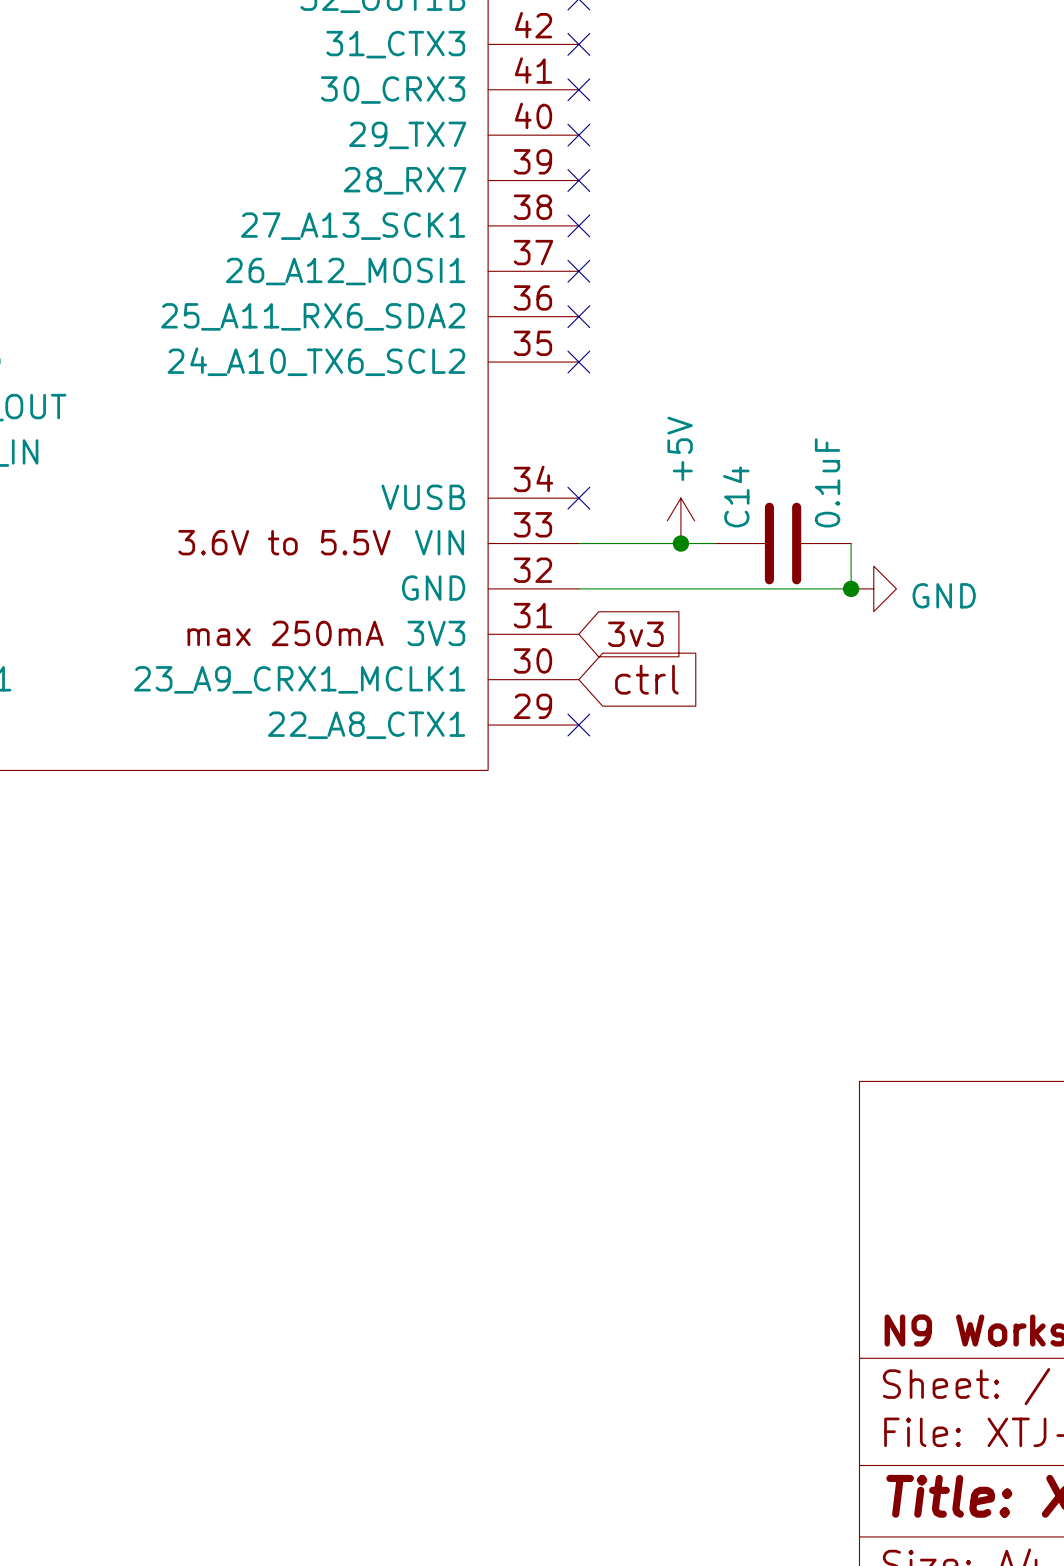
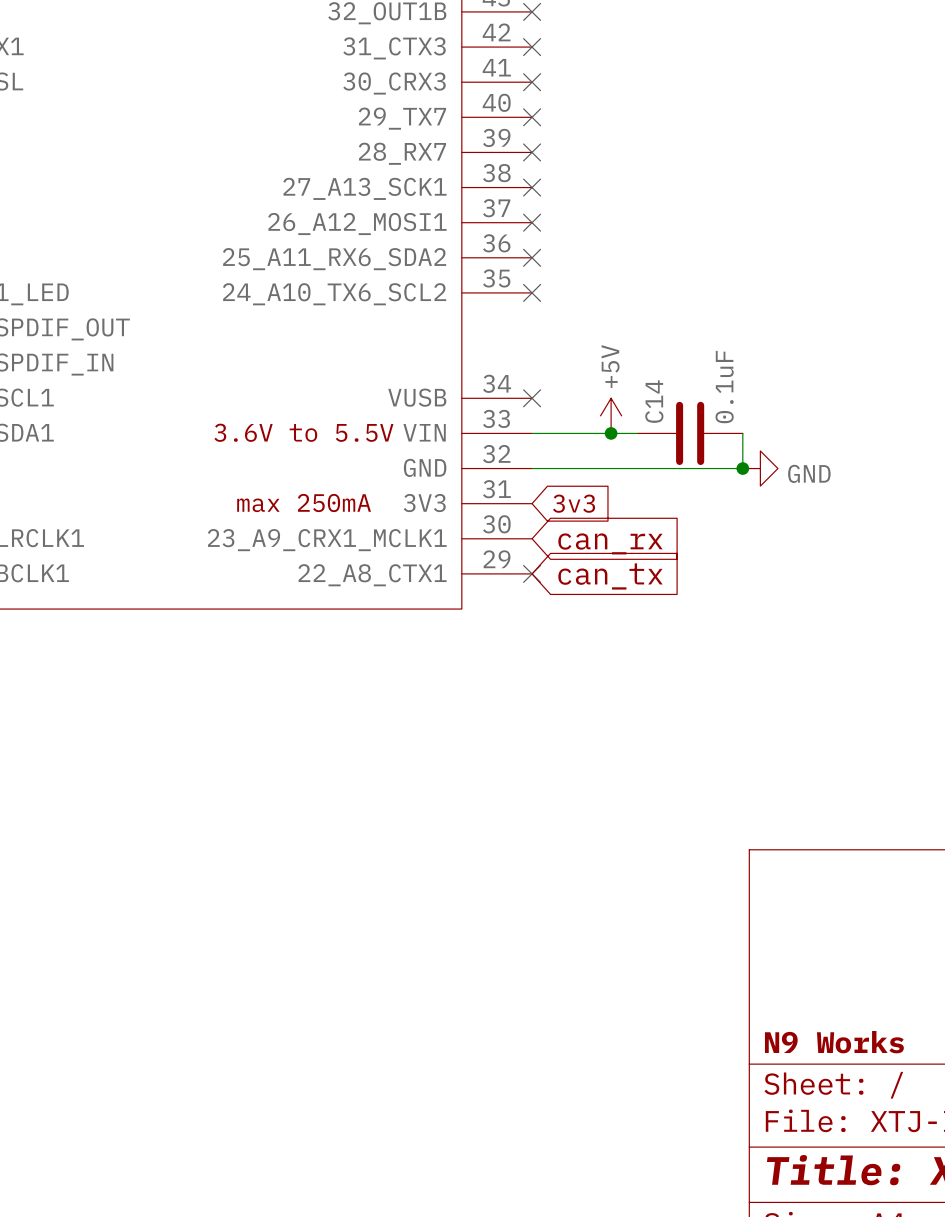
global label: ctrl (646, 679) -> can_rx (610, 543)
global label: none -> can_tx (610, 576)

